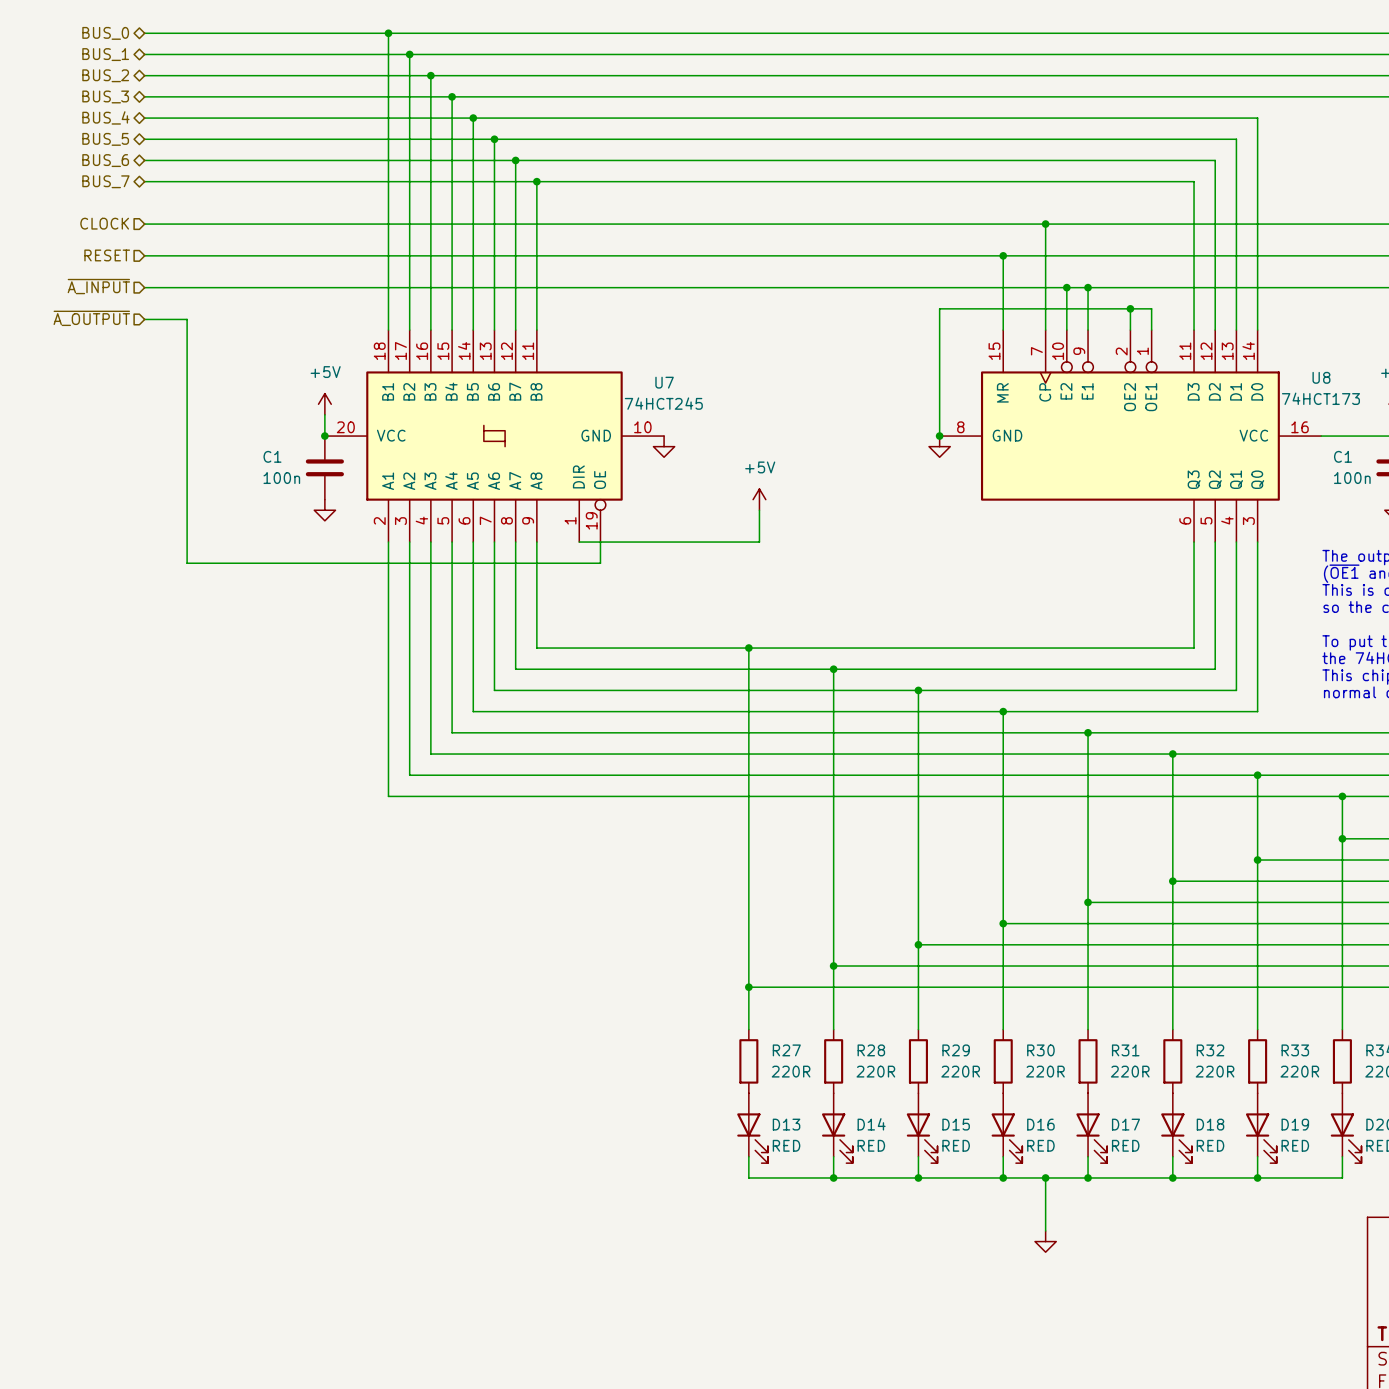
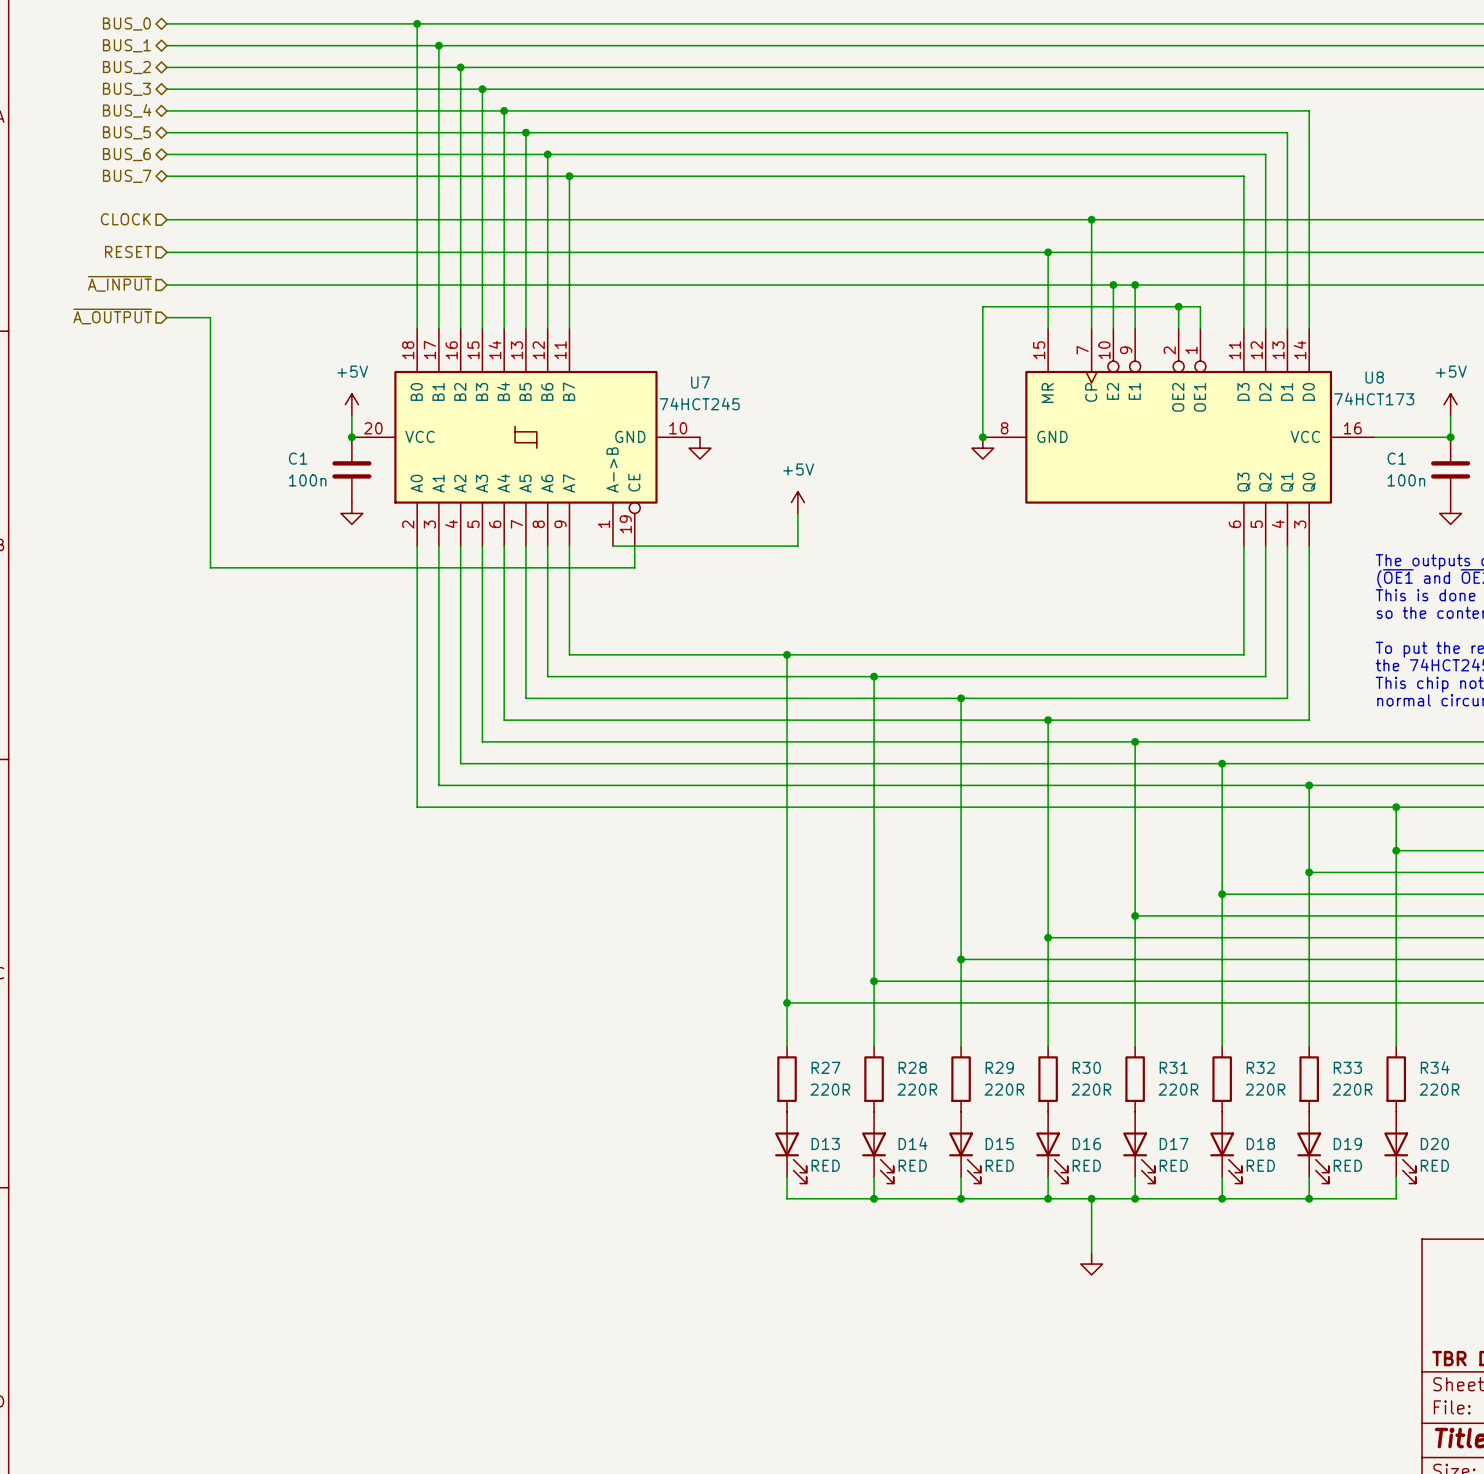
U7 symbol: [324, 330, 665, 543] -> [351, 328, 701, 547]

